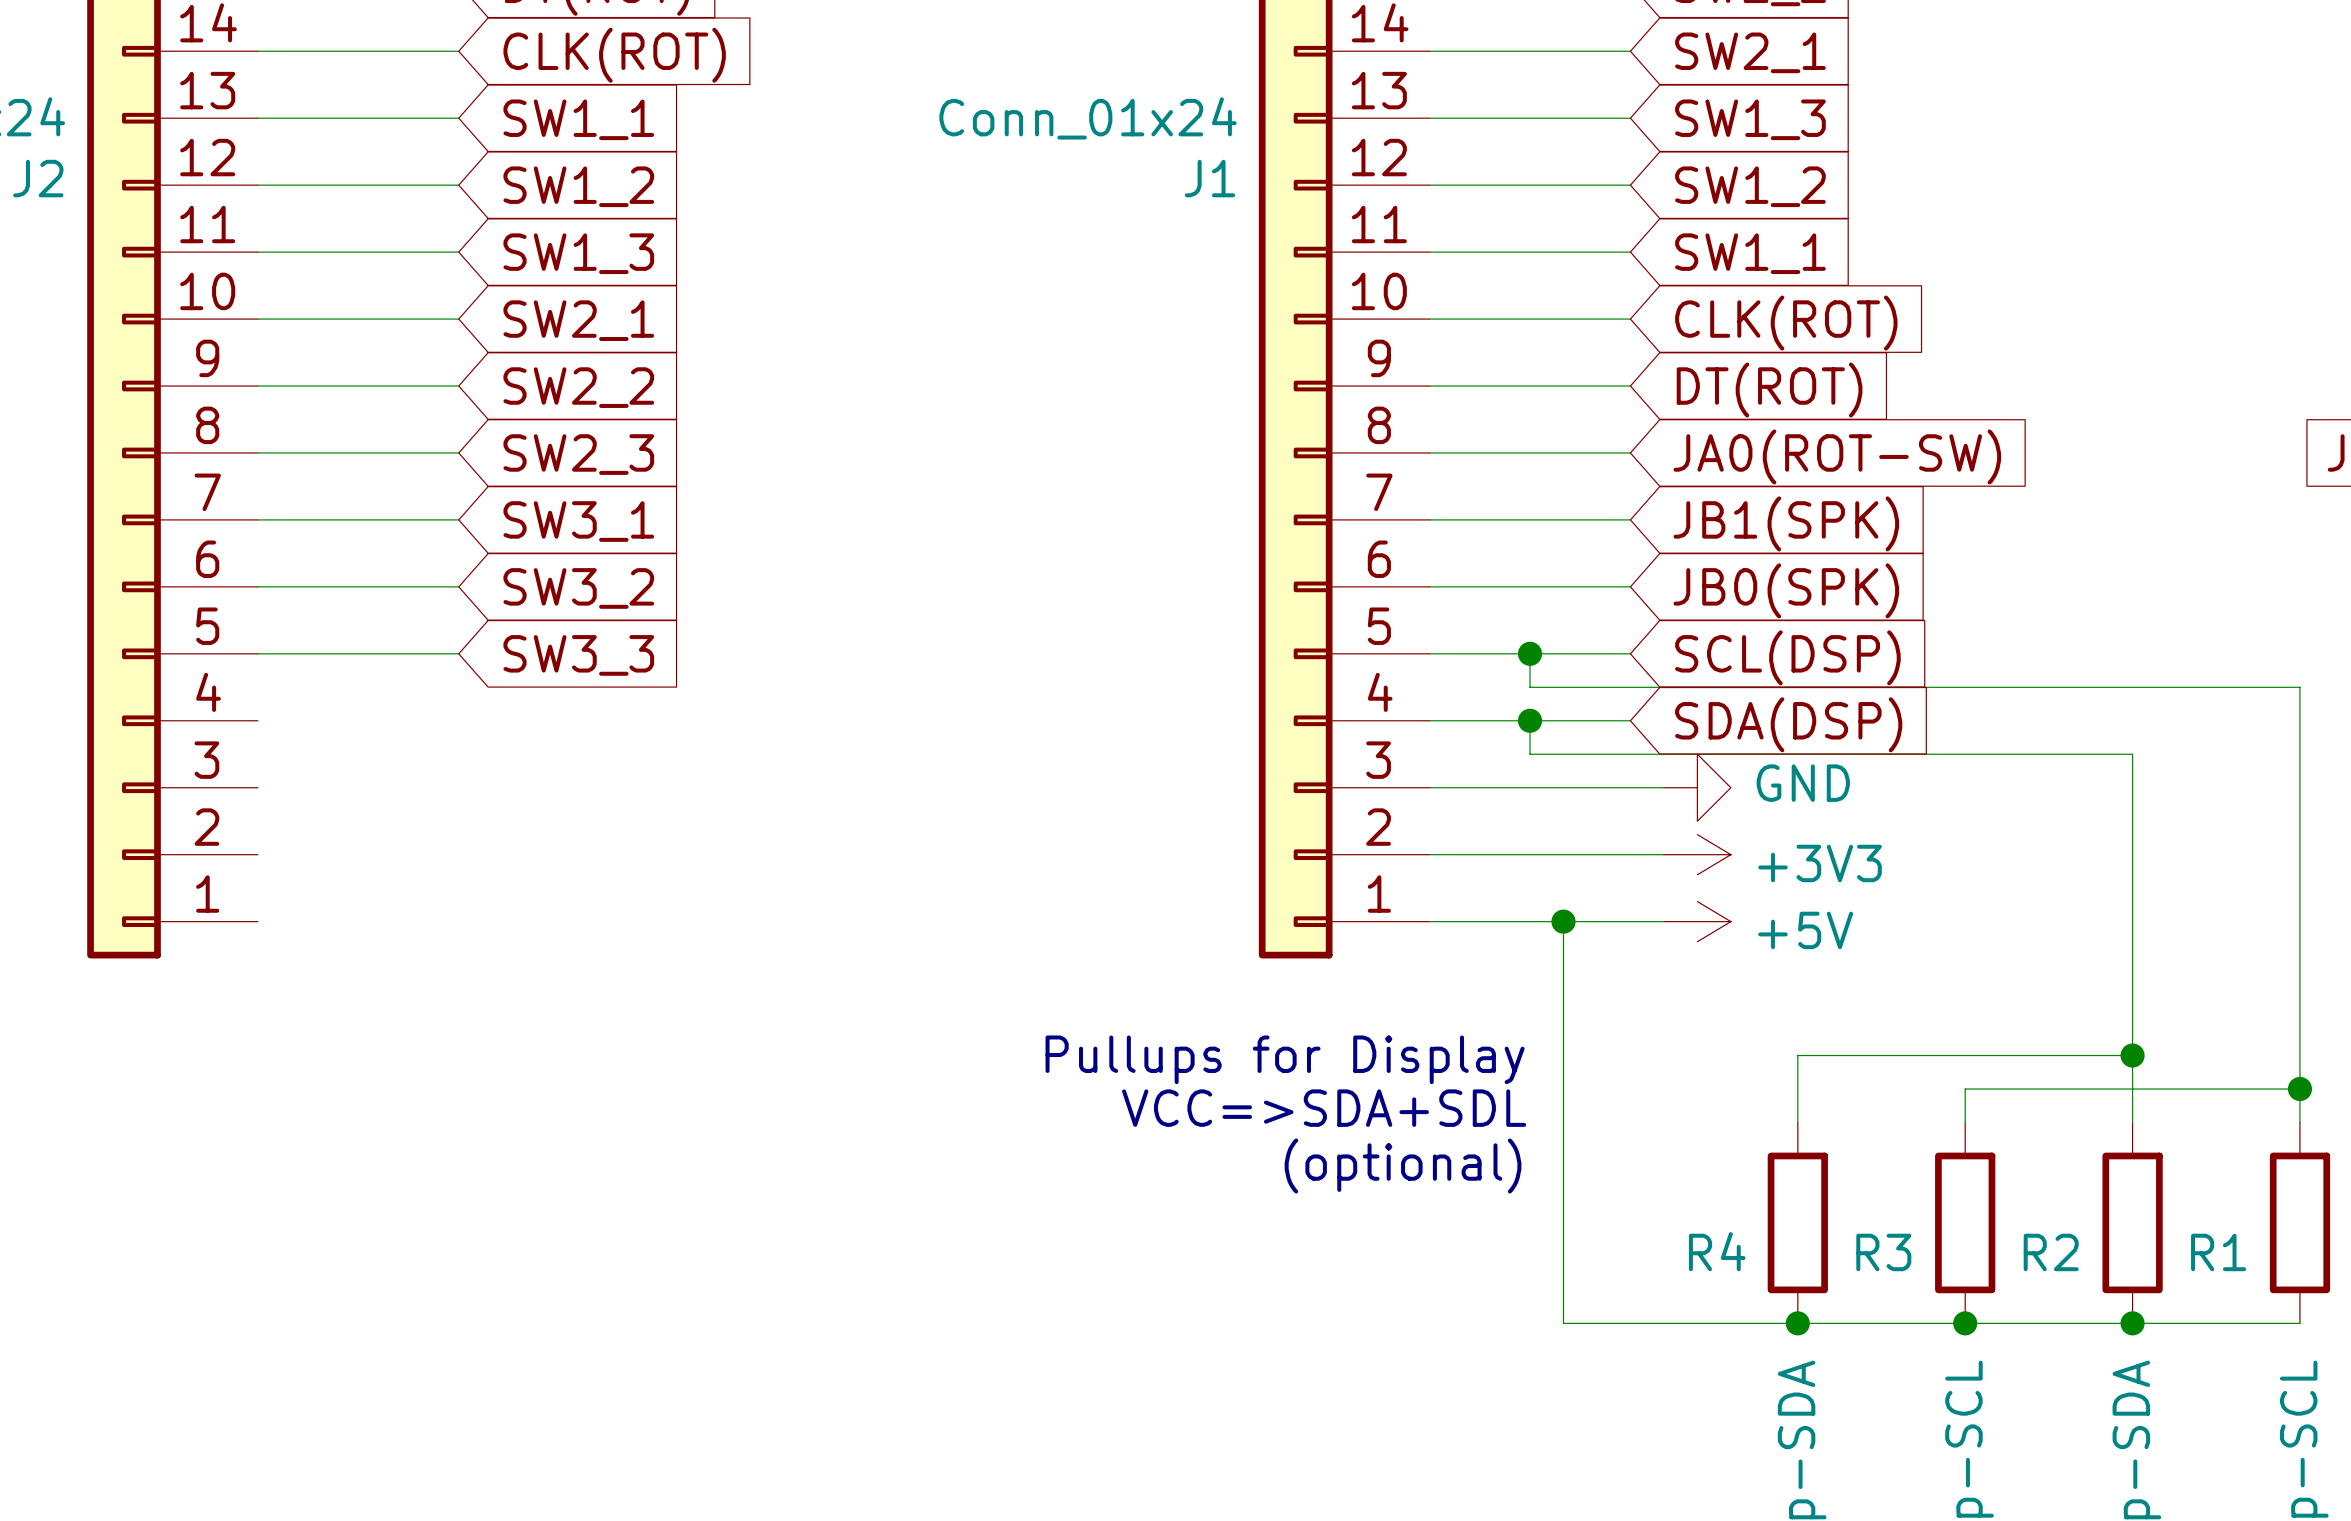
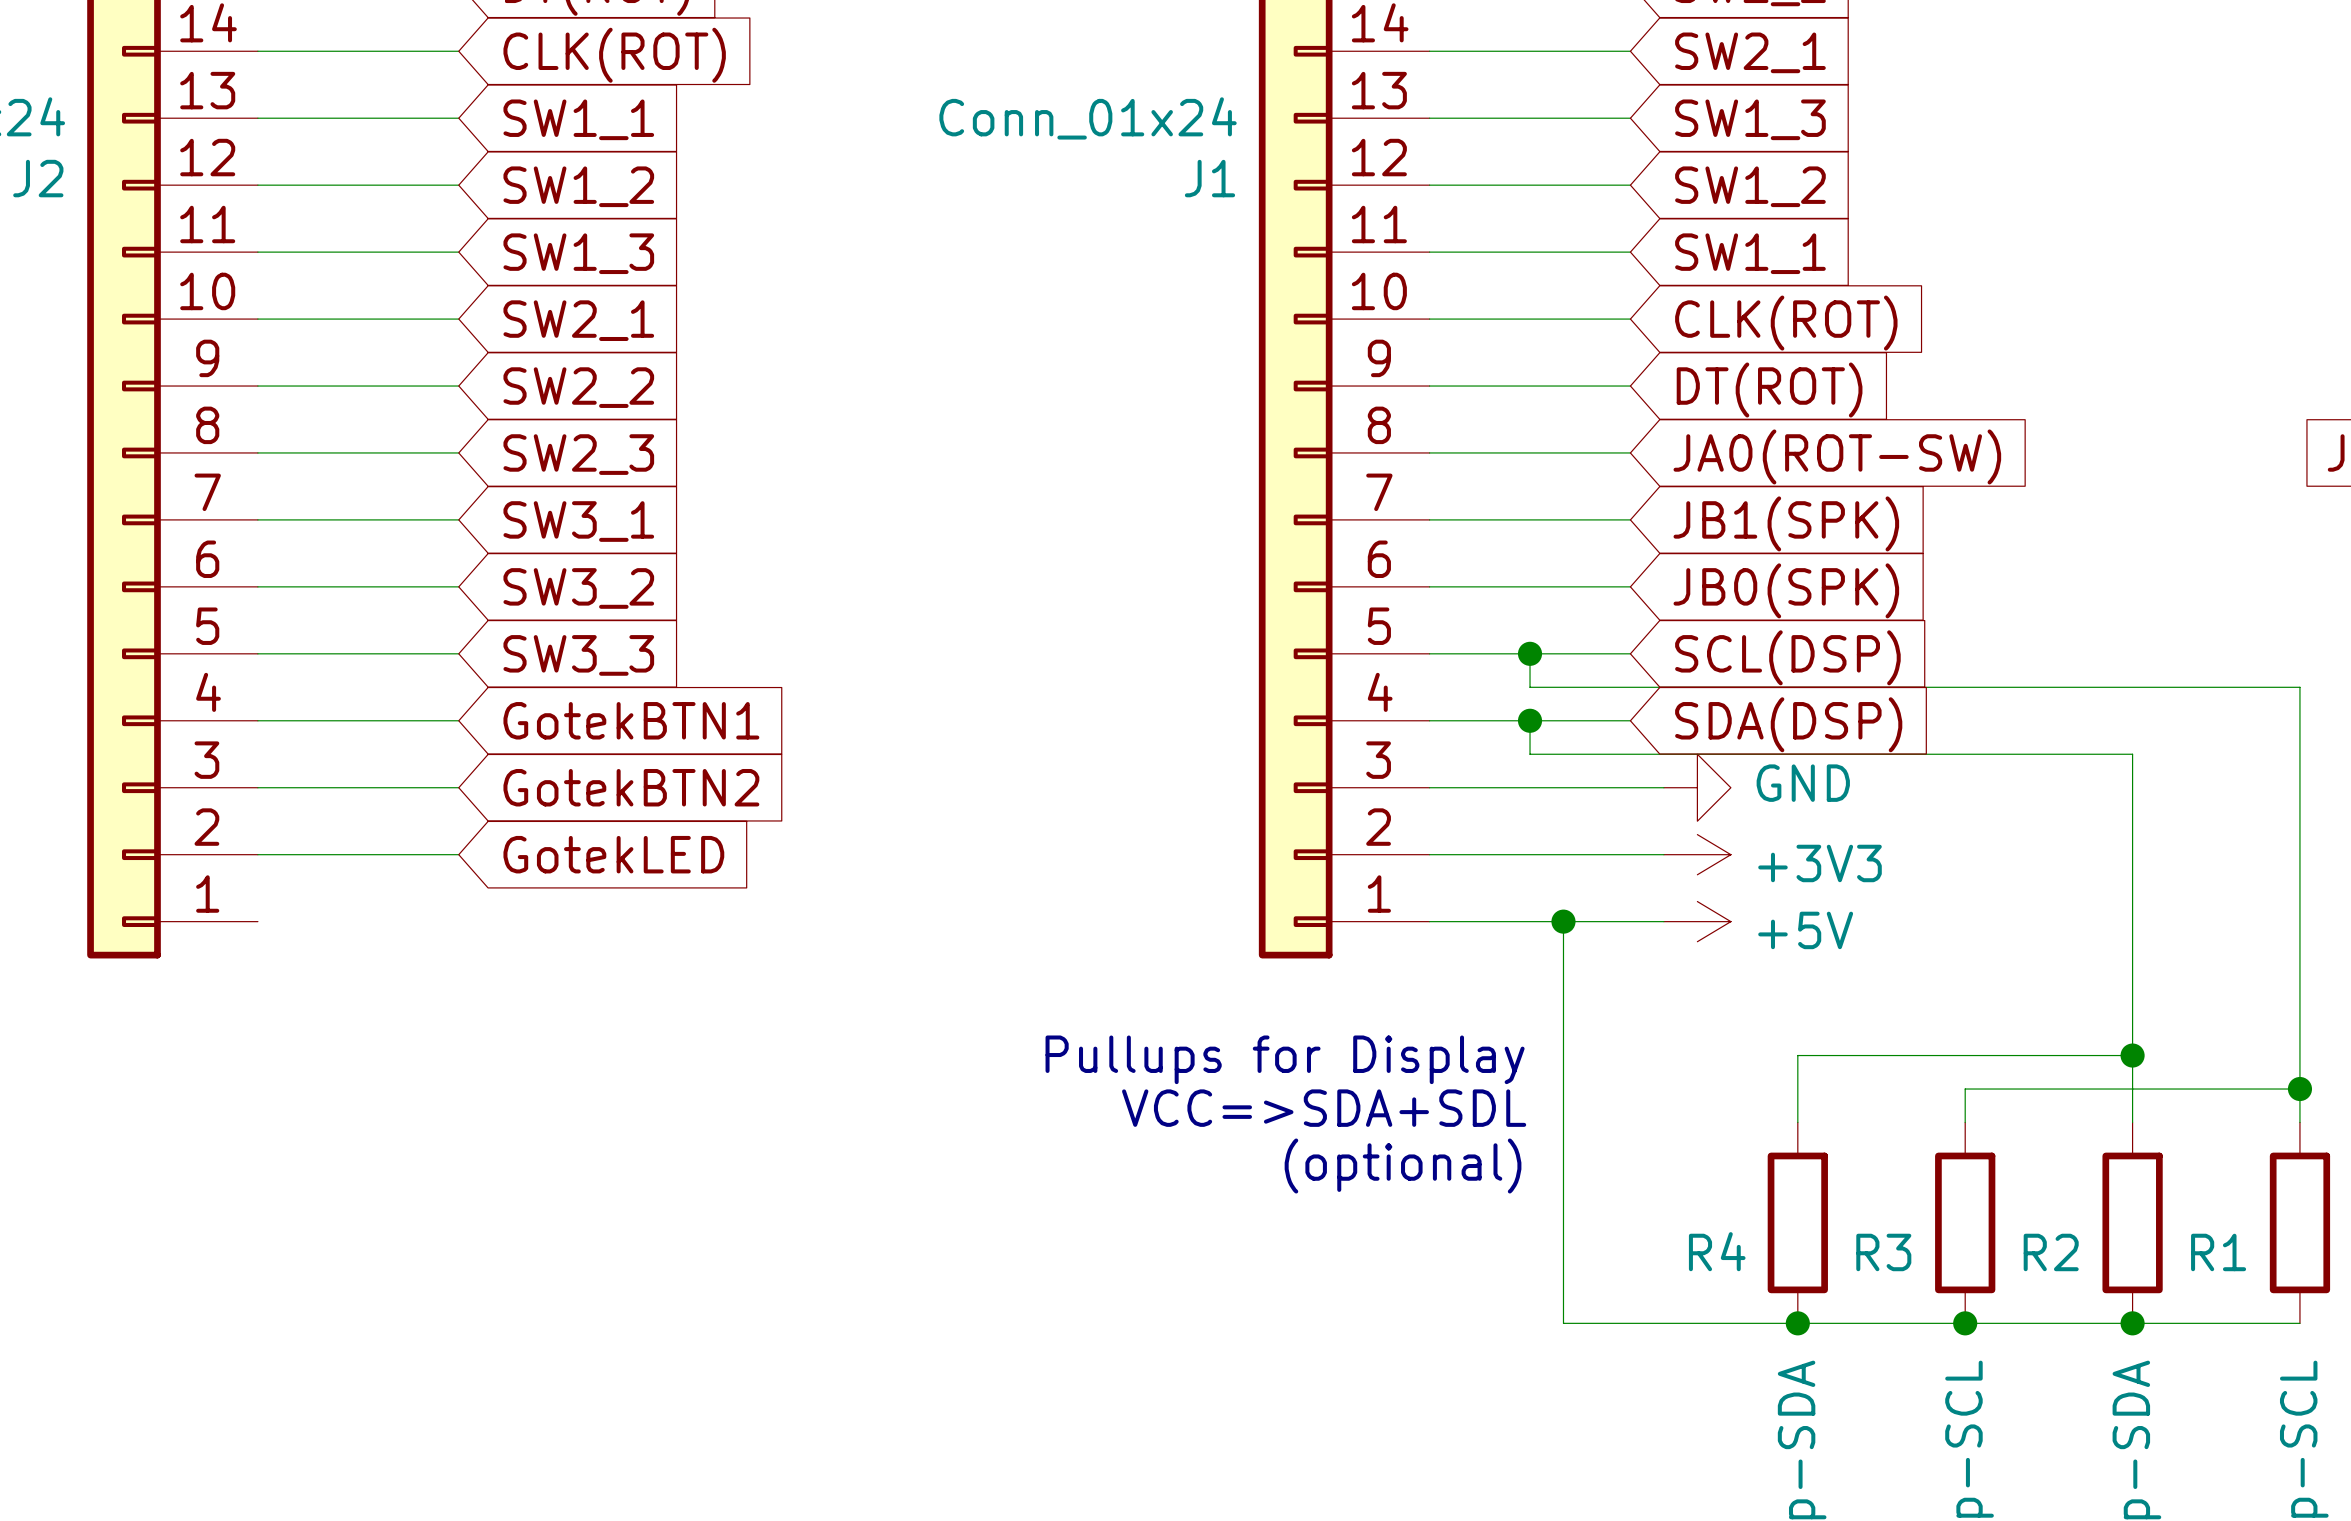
wire: none -> (257, 720) (458, 720)
global label: none -> GotekBTN1 (631, 720)
wire: none -> (257, 787) (458, 787)
global label: none -> GotekBTN2 (631, 787)
wire: none -> (257, 854) (458, 854)
global label: none -> GotekLED (613, 854)

